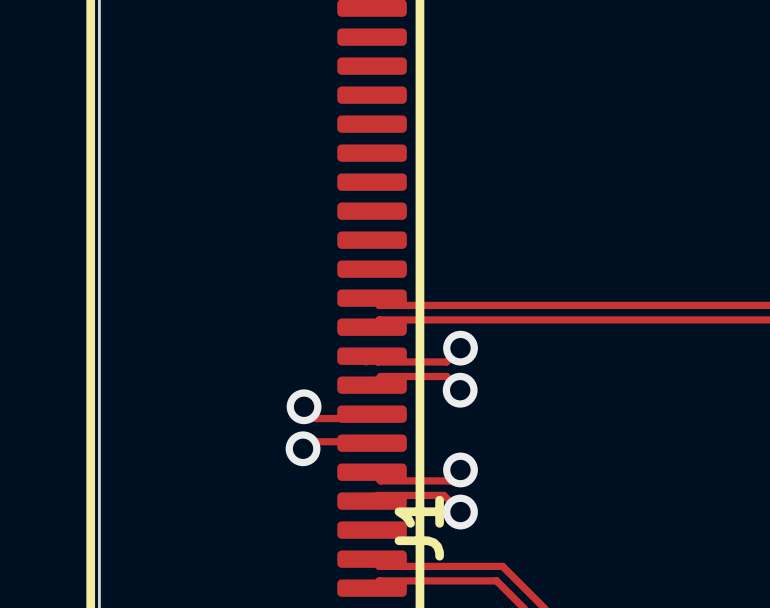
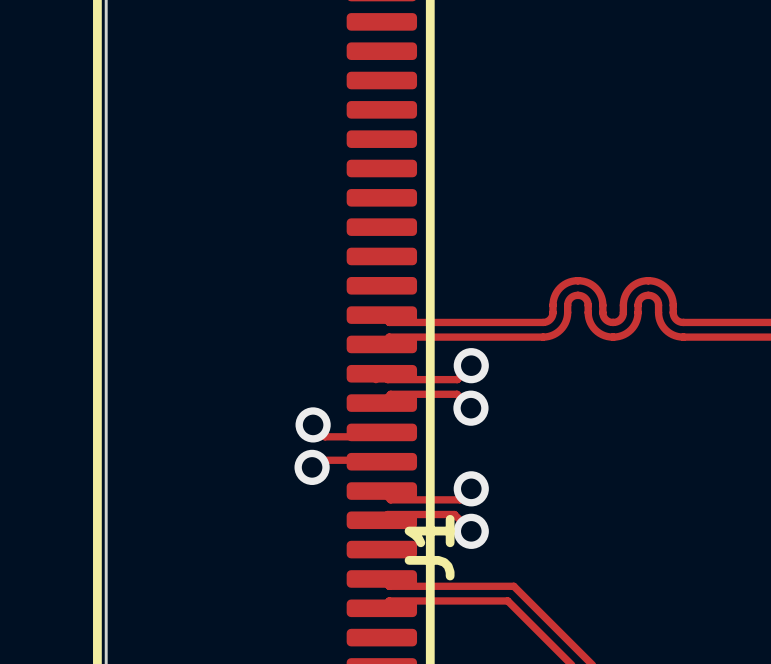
track: none -> (578, 280) (588, 283) (597, 289) (602, 299) (603, 316) (606, 320) (612, 322)
track: none -> (648, 280) (659, 283) (667, 289) (672, 299) (673, 316) (677, 320) (683, 322)
track: none -> (578, 295) (584, 297) (587, 301) (588, 318) (593, 327) (602, 334) (612, 337)
track: none -> (648, 295) (654, 297) (657, 301) (659, 318) (663, 327) (672, 334) (683, 337)
track: (531, 305) (600, 305) -> (543, 322) (549, 320) (552, 316) (553, 299) (558, 289) (566, 283) (577, 280)
track: (601, 305) (670, 305) -> (613, 322) (619, 320) (622, 316) (623, 299) (628, 289) (637, 283) (647, 280)
track: (531, 319) (600, 319) -> (543, 337) (553, 334) (562, 327) (567, 318) (568, 301) (571, 297) (577, 295)
track: (601, 319) (670, 319) -> (613, 337) (624, 334) (632, 327) (637, 318) (638, 301) (641, 297) (647, 295)

